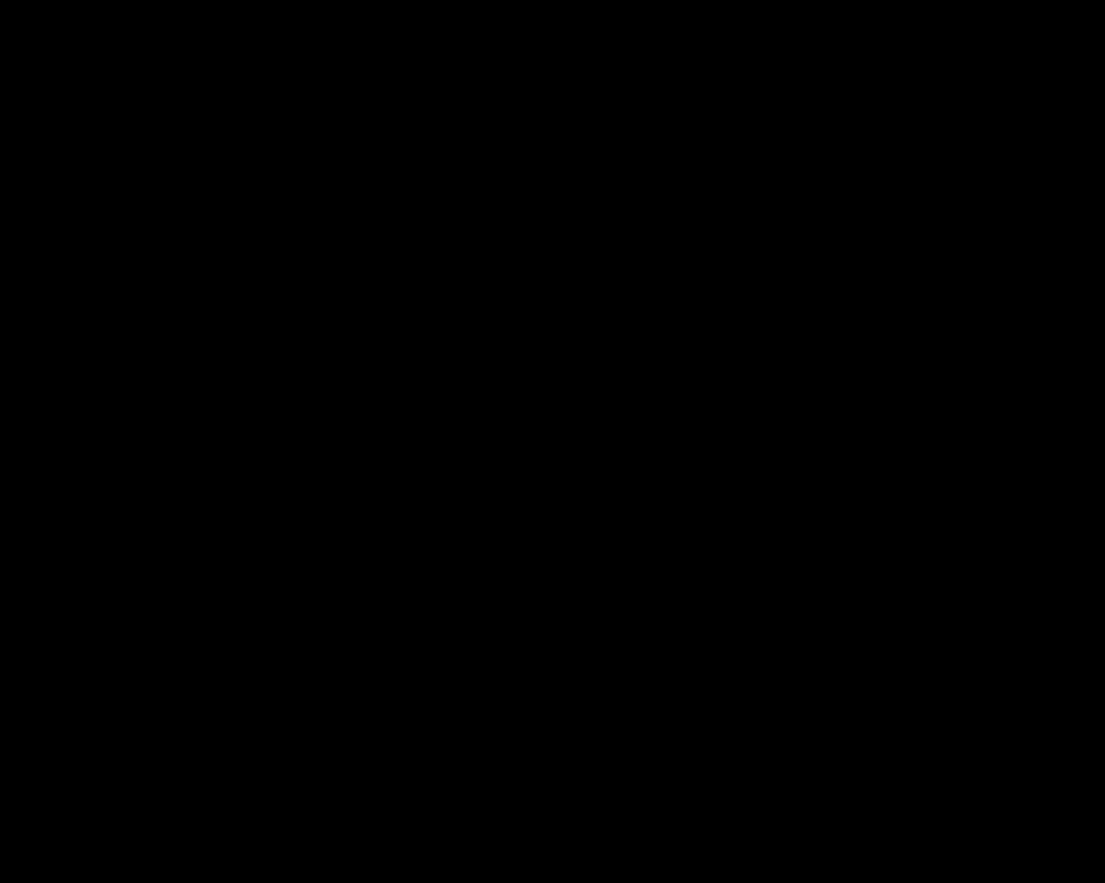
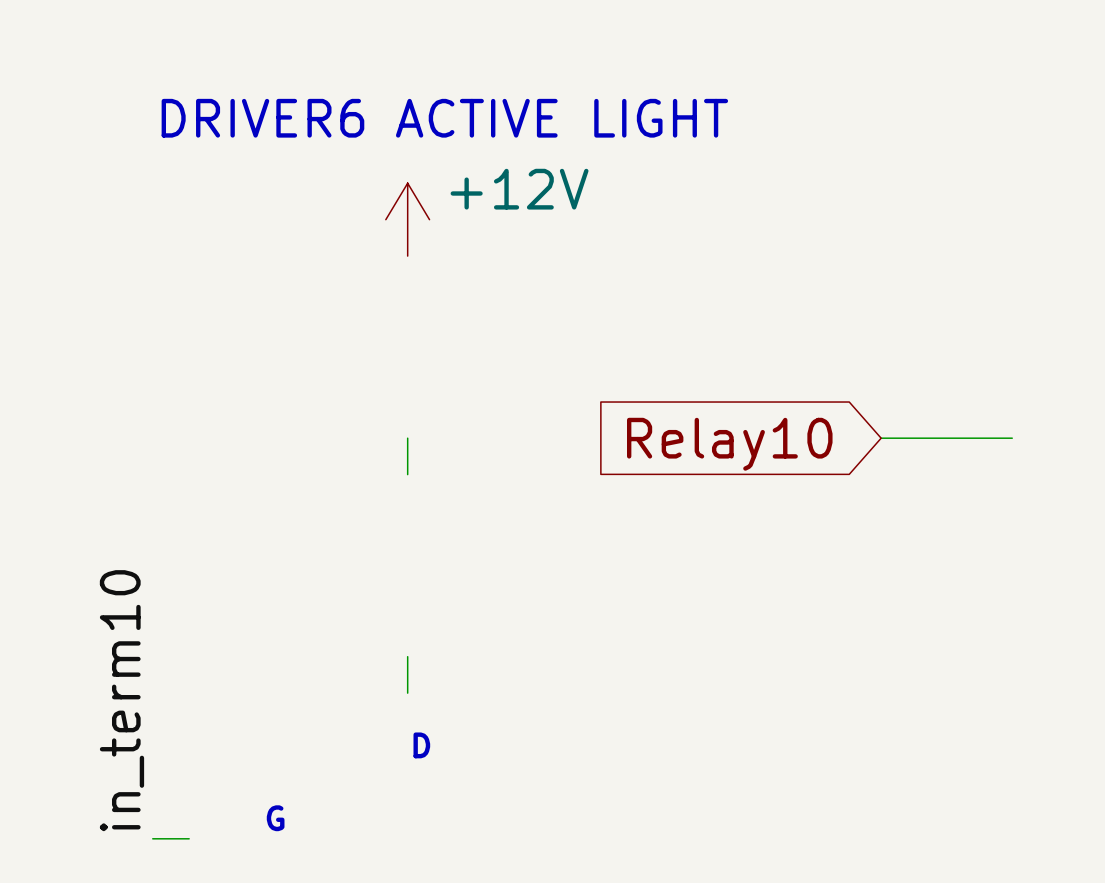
text: none -> DRIVER6 ACTIVE LIGHT (444, 118)
power symbol: none -> +12V (407, 219)
wire: none -> (407, 438) (407, 474)
wire: none -> (881, 438) (1012, 438)
global label: none -> Relay10 (729, 444)
wire: none -> (407, 656) (407, 693)
label: none -> in_term10 (121, 700)
text: none -> D (421, 745)
text: none -> G (275, 818)
wire: none -> (152, 838) (189, 838)

